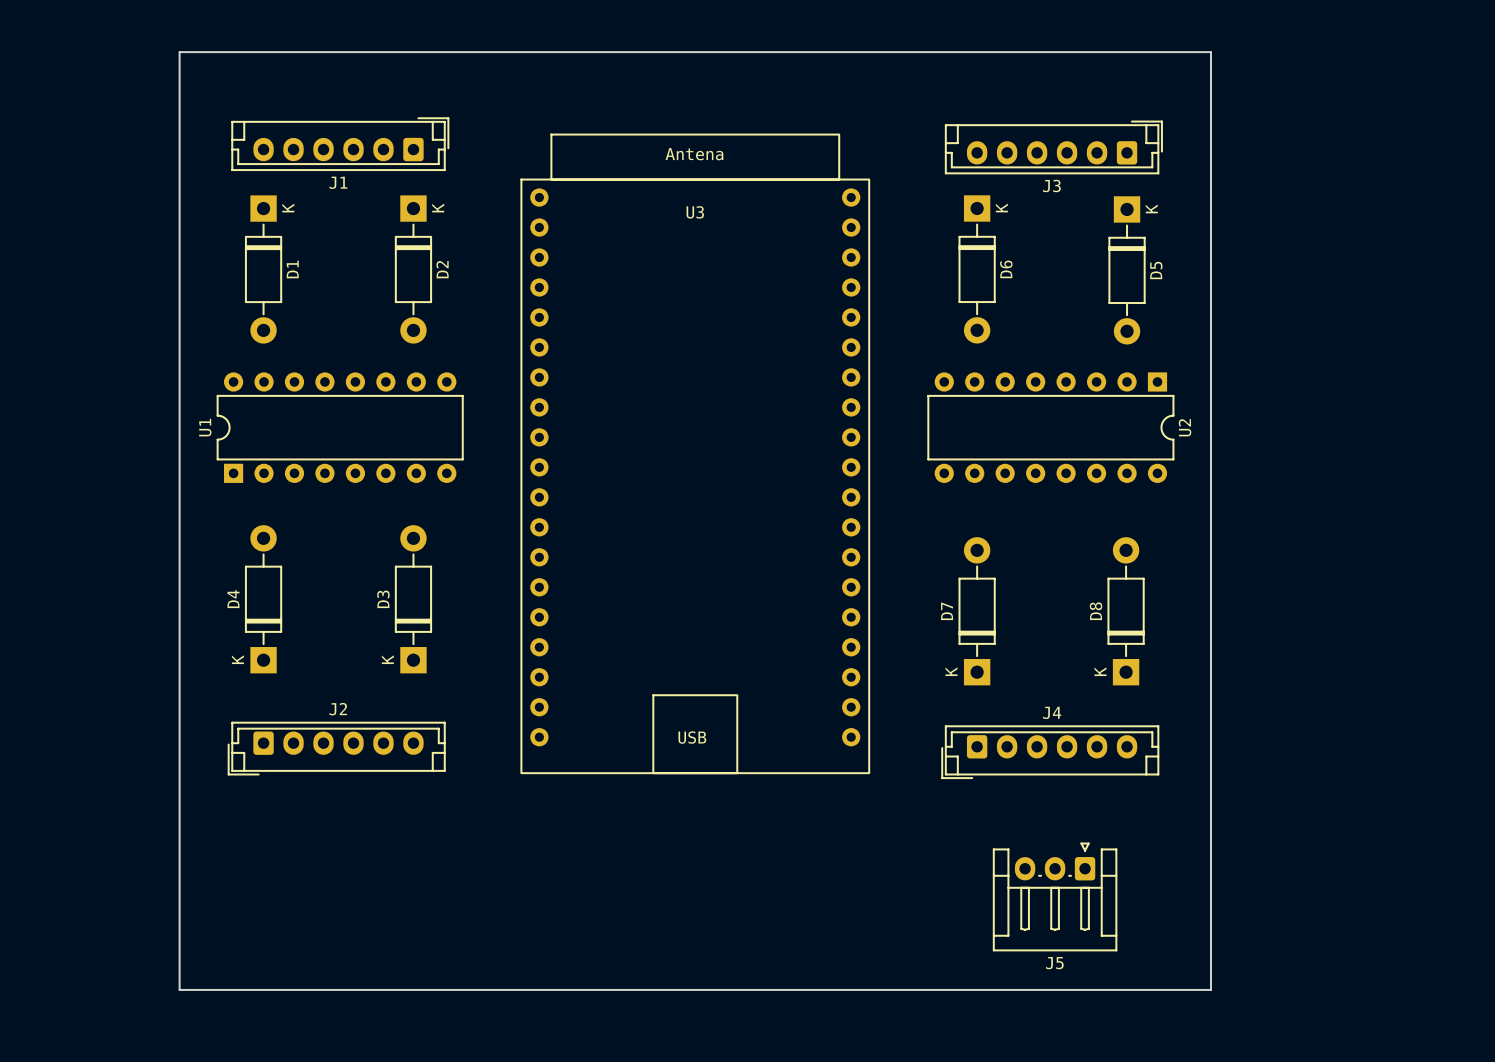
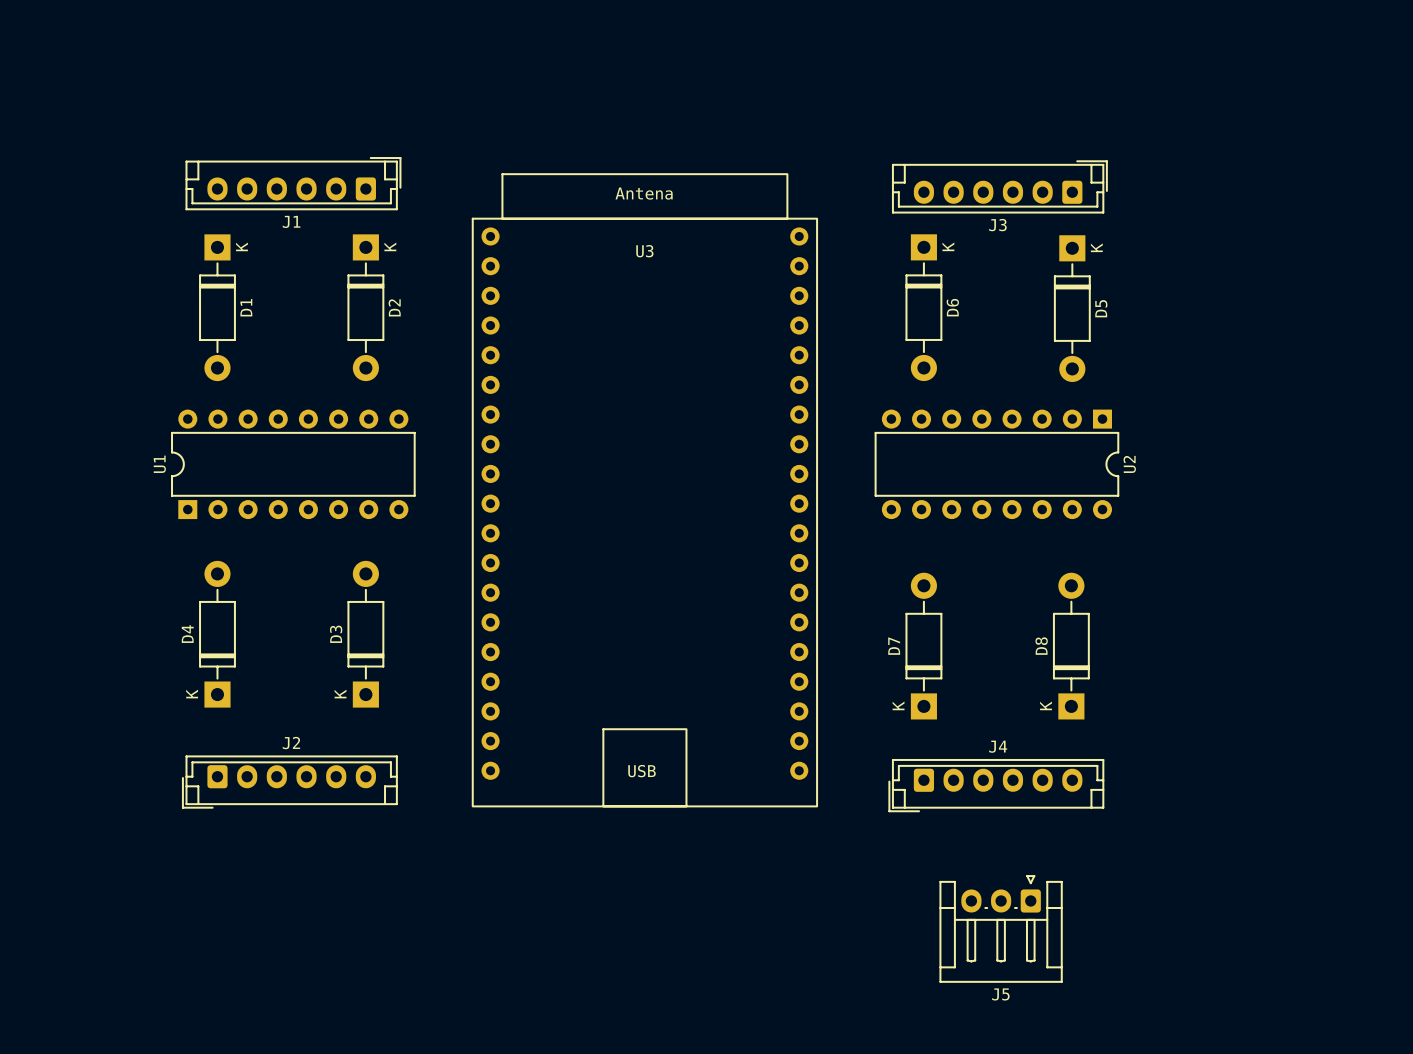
board edge: (179, 52) (1210, 52) (1210, 989) (179, 989) (179, 52) -> none

